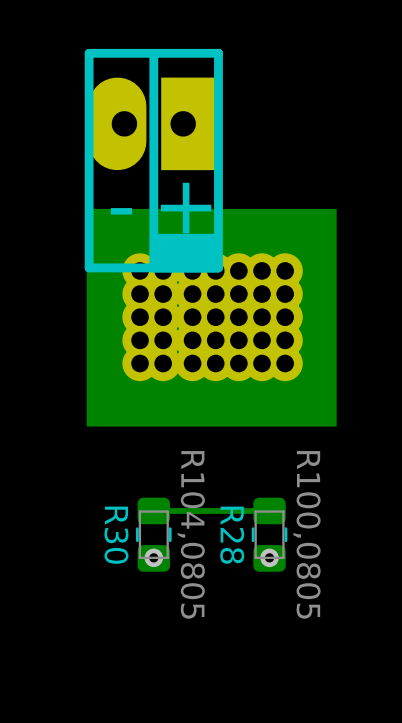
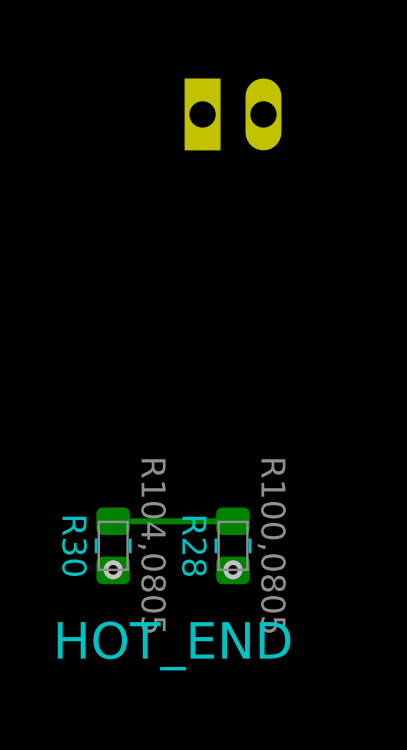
part: none -> HOT_END (233, 114)
part: (153, 160) -> none
part: (211, 317) -> none

